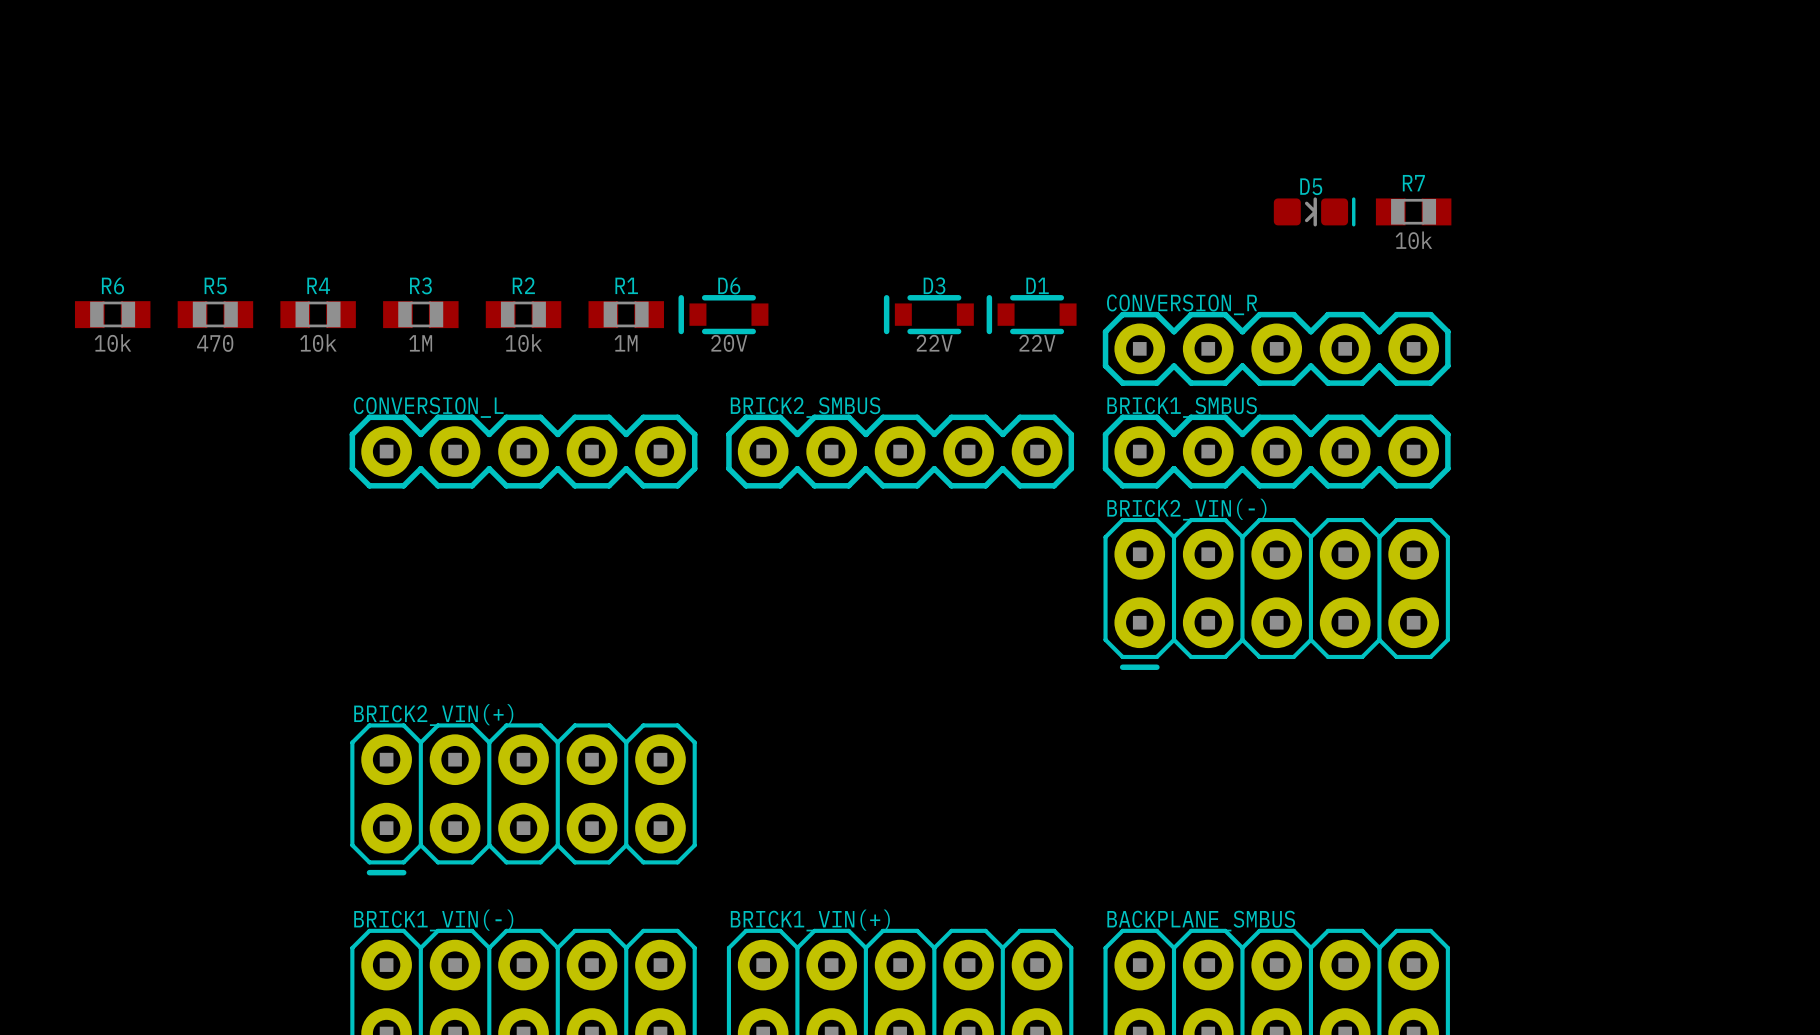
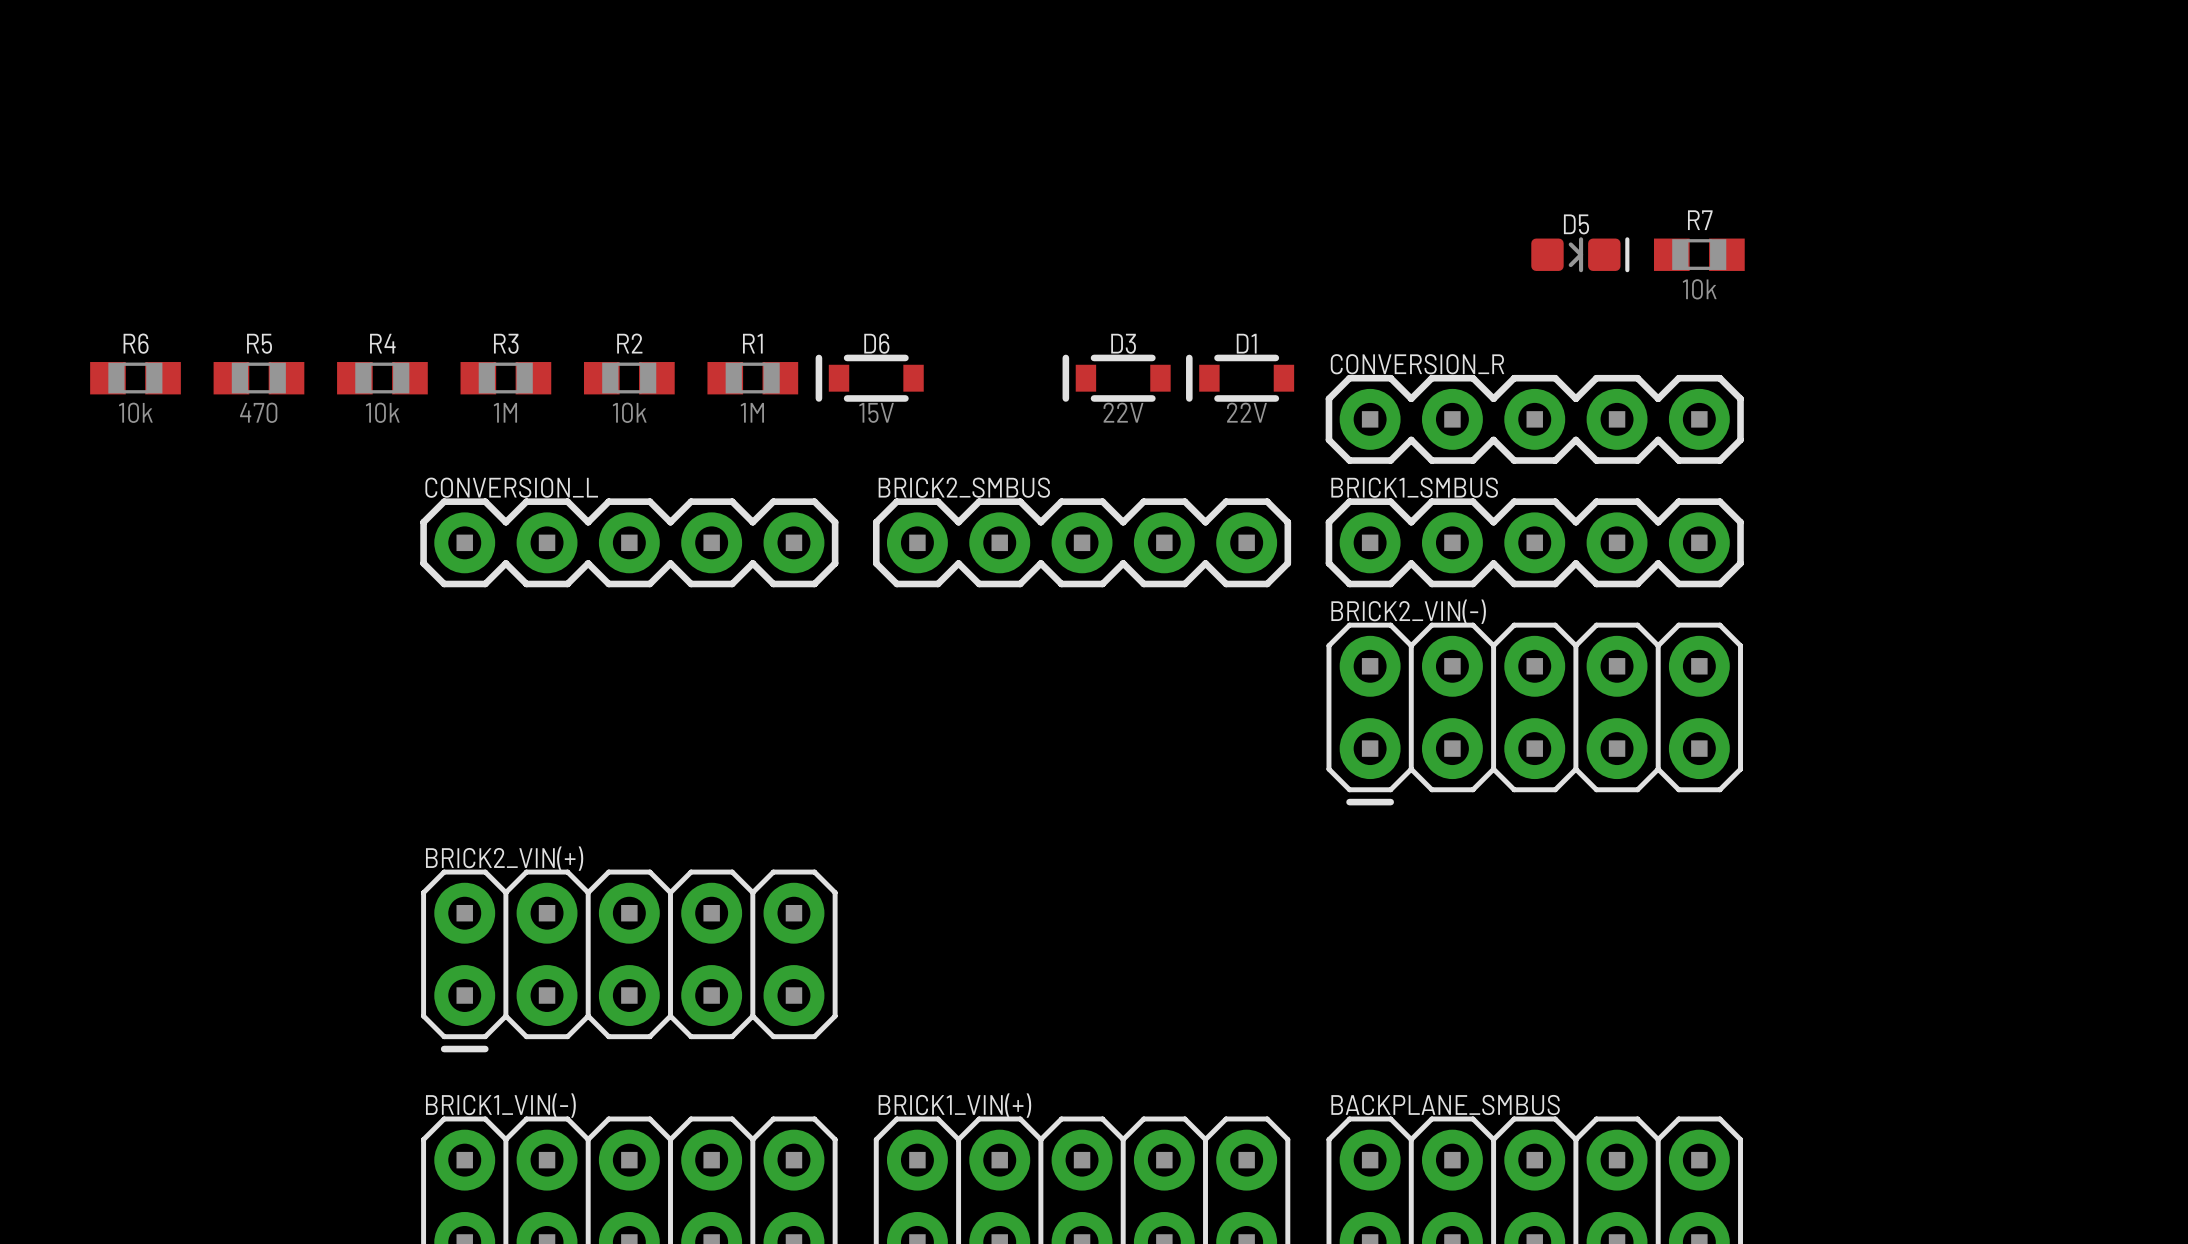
D6 value: 20V (729, 343) -> 15V (876, 412)

